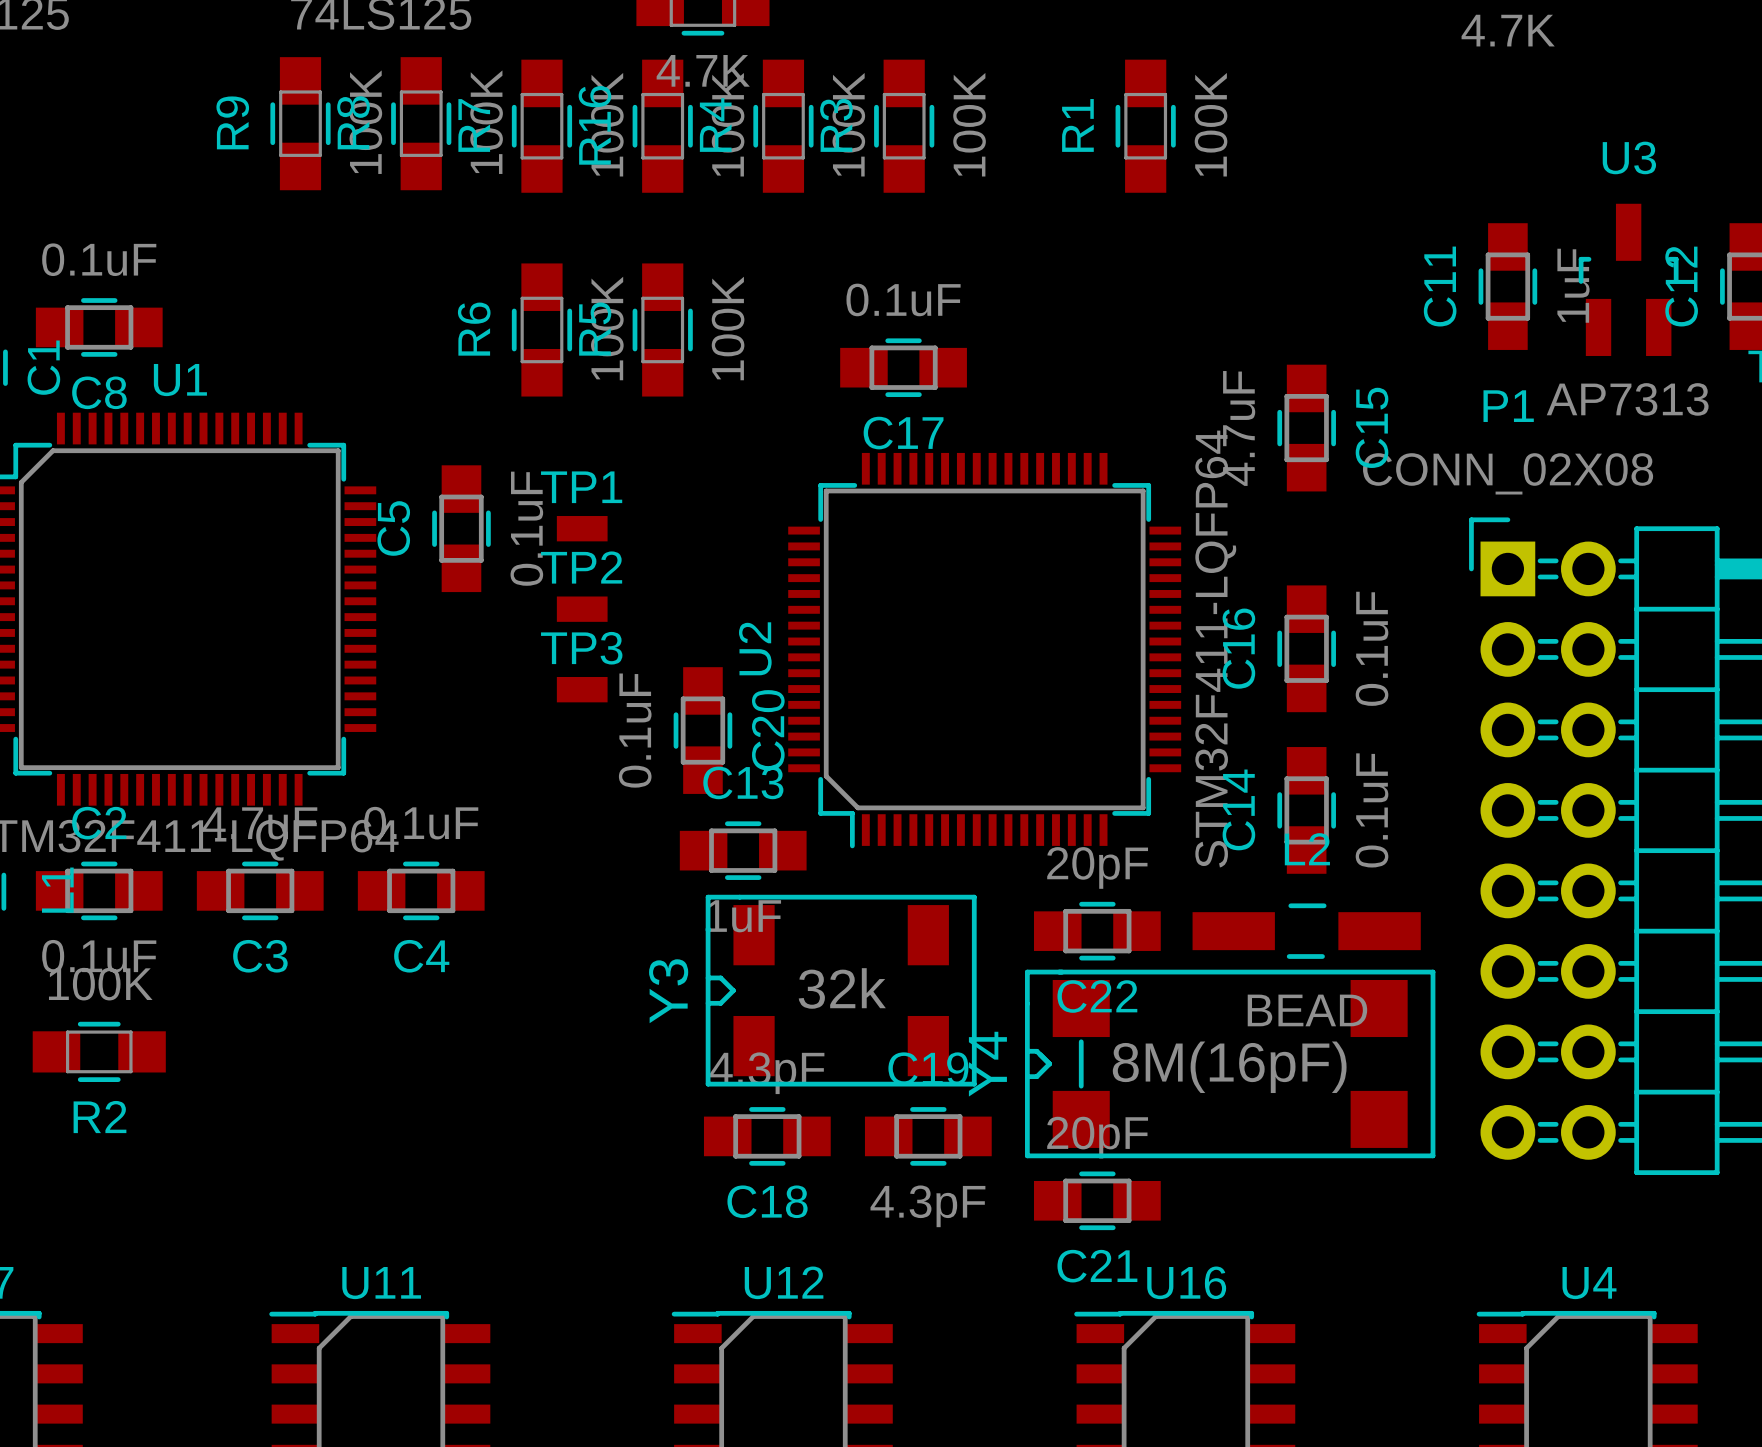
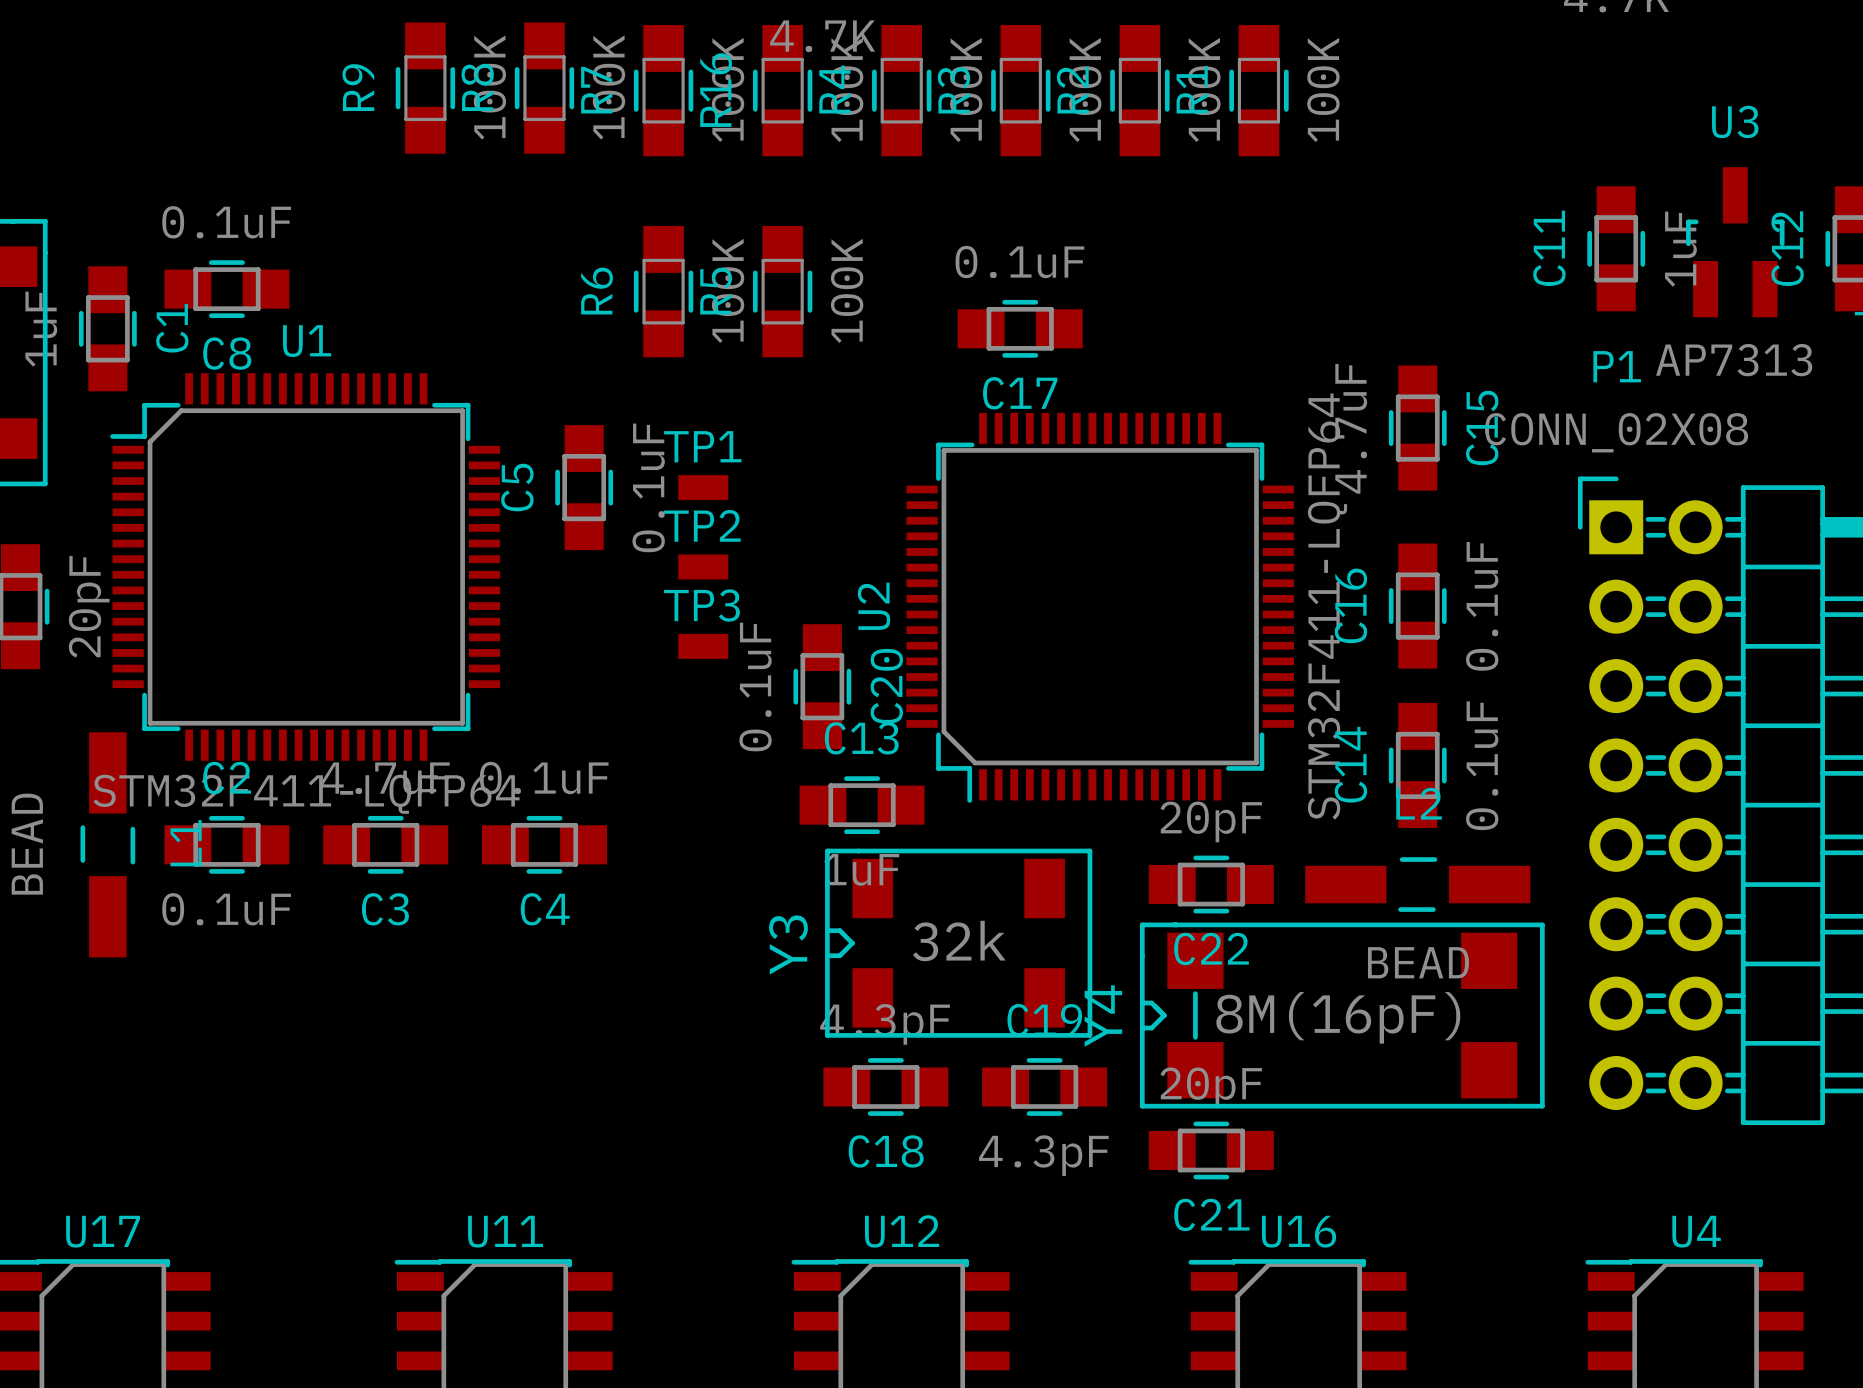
C15 position: (1306, 428) -> (1417, 428)
R2 rotation: 0° (99, 1051) -> 90° clockwise (1139, 90)
R2 position: (99, 1051) -> (1139, 90)

